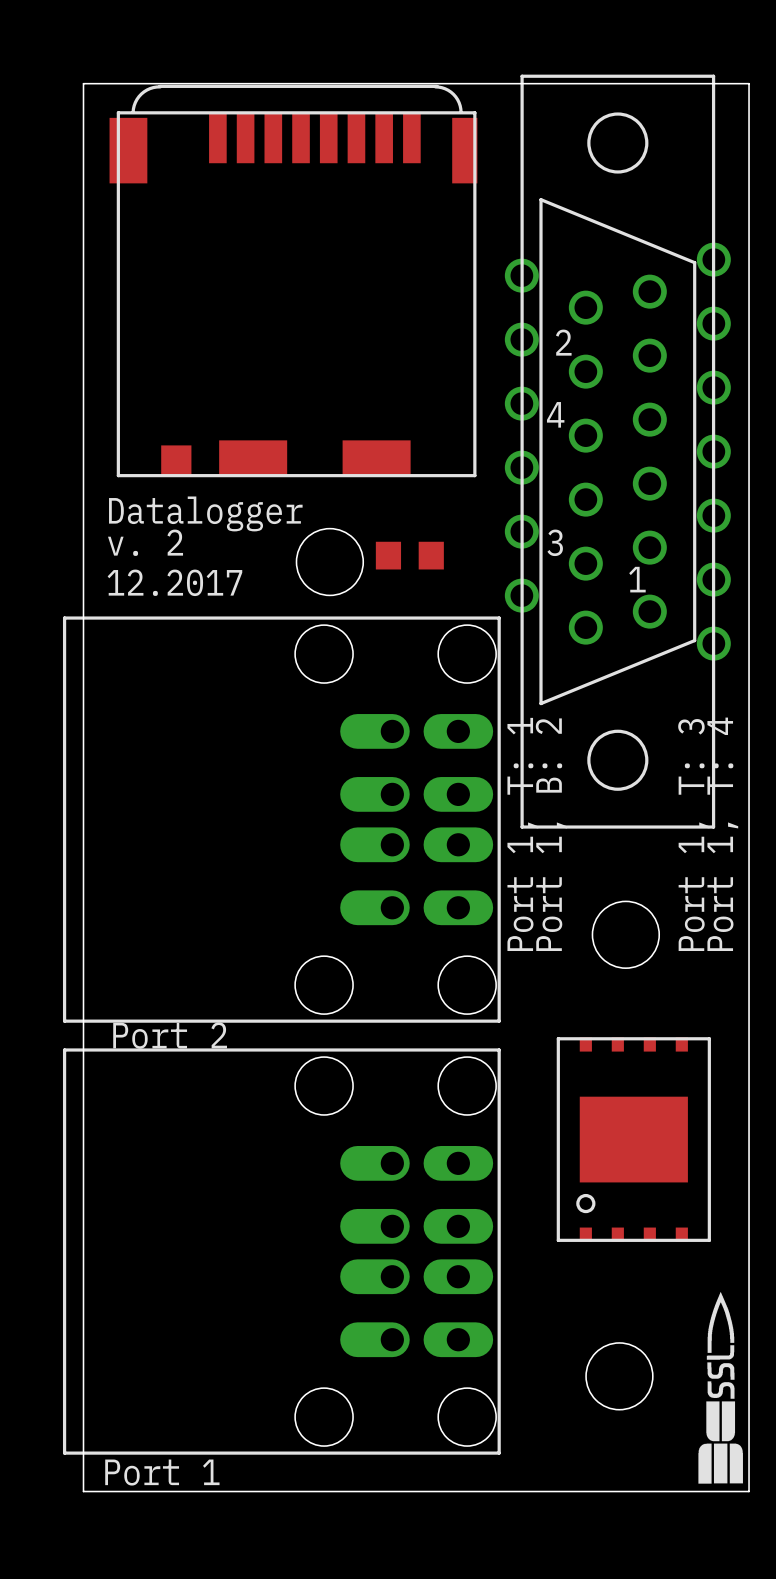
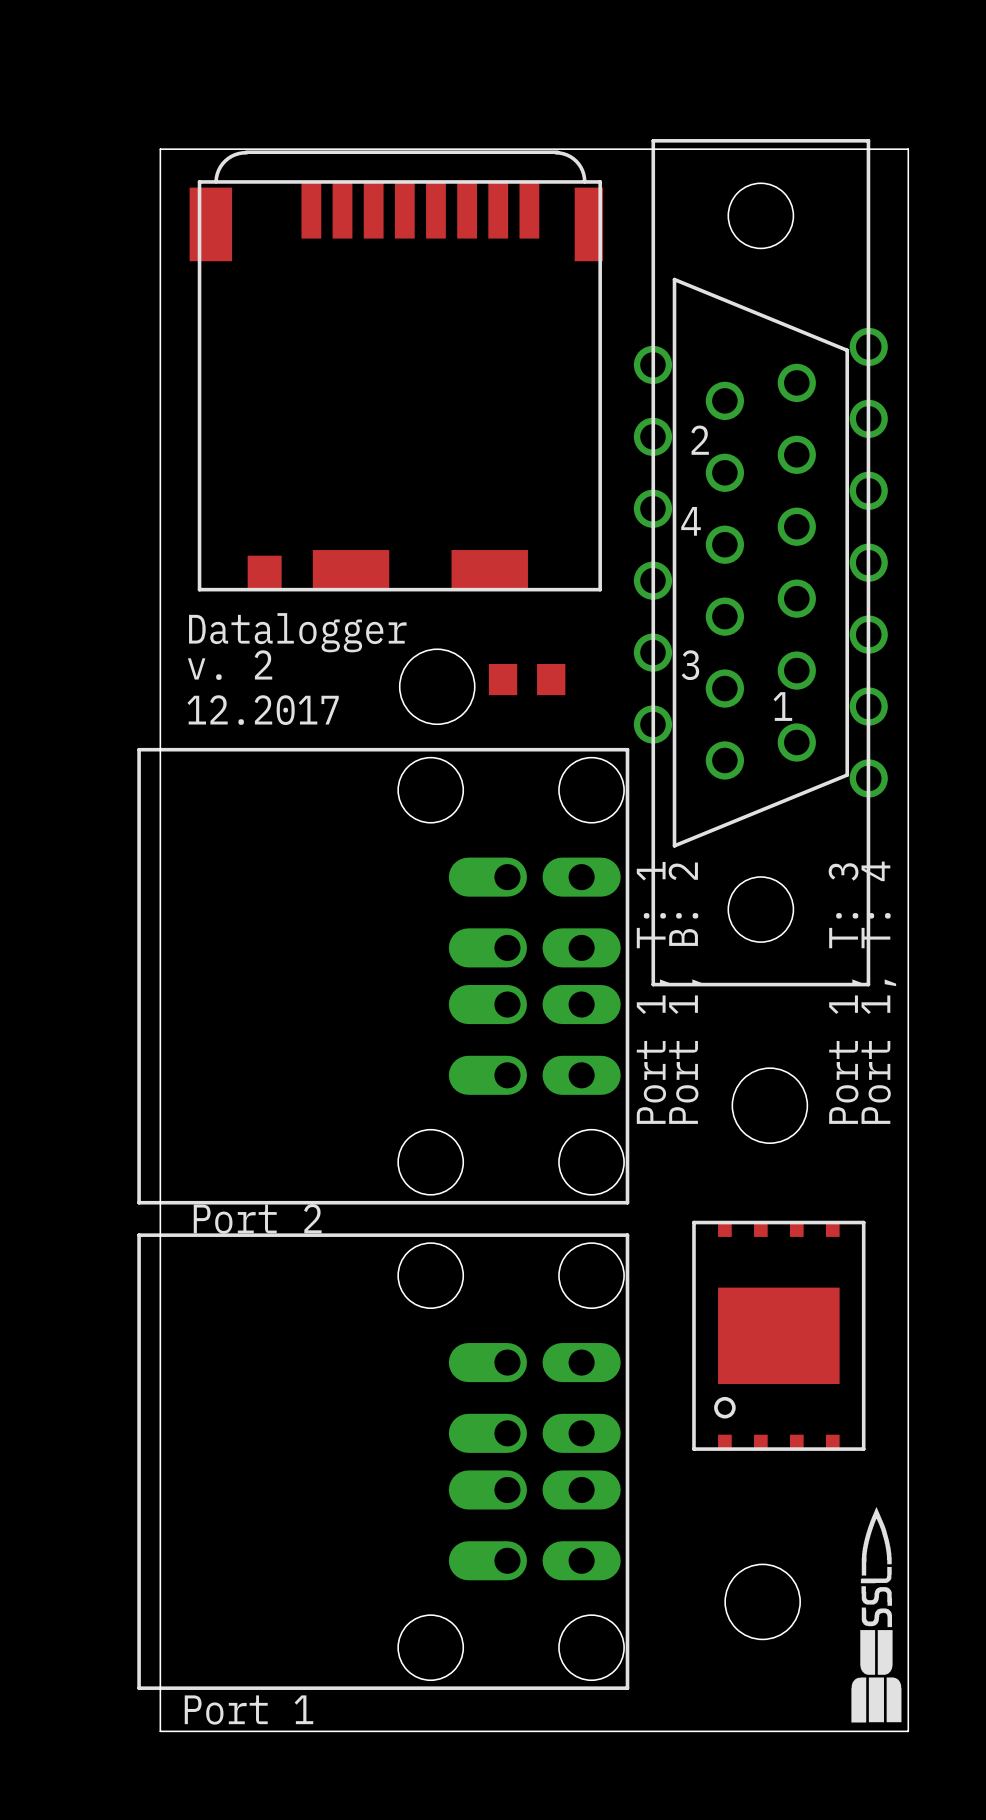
part footprint: [504, 74, 731, 829] -> [633, 139, 888, 987]

